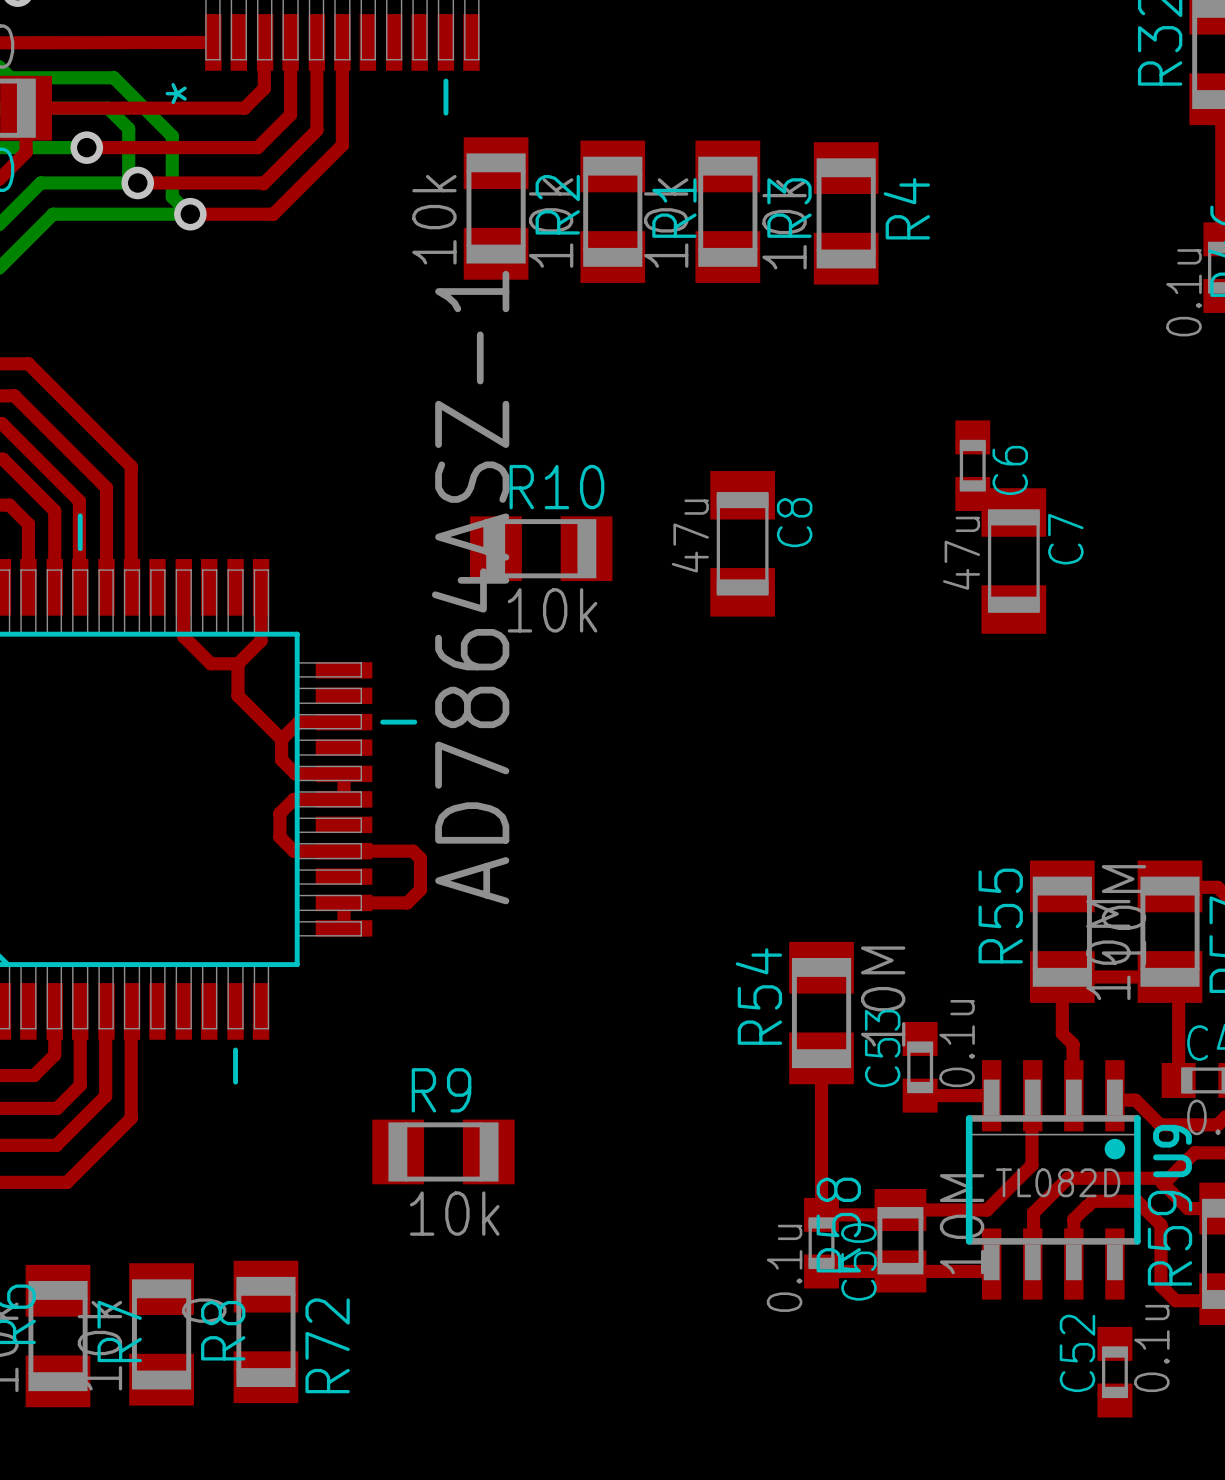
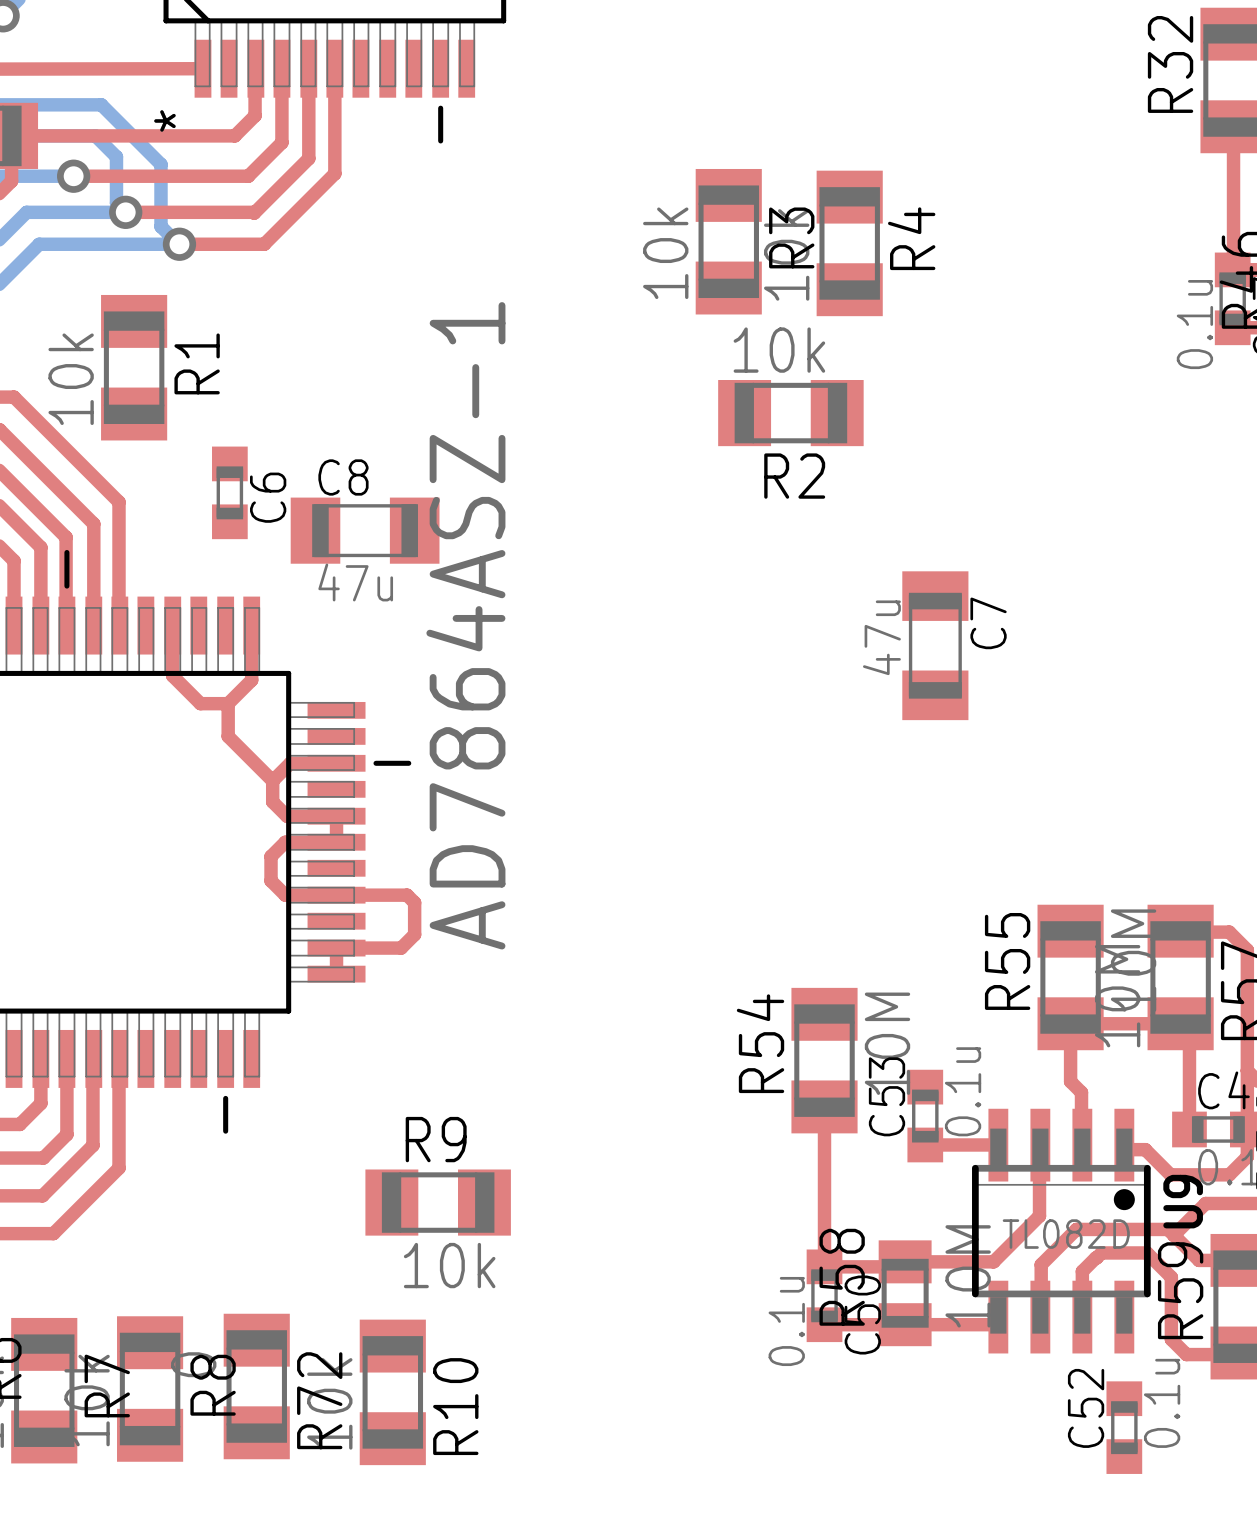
R2 rotation: 0° (496, 208) -> 90° clockwise (790, 413)
R2 position: (496, 208) -> (790, 413)
R1 position: (612, 211) -> (134, 367)
C6 position: (972, 465) -> (229, 492)
C8 name position: C8 (794, 522) -> C8 (343, 477)
C8 value position: 47u (690, 536) -> 47u (355, 582)
C8 rotation: 0° (742, 543) -> 90° clockwise (365, 530)
C8 position: (742, 543) -> (365, 530)
R10 rotation: 0° (541, 548) -> 90° clockwise (392, 1392)
R10 position: (541, 548) -> (392, 1392)
C7 position: (1013, 561) -> (935, 645)

